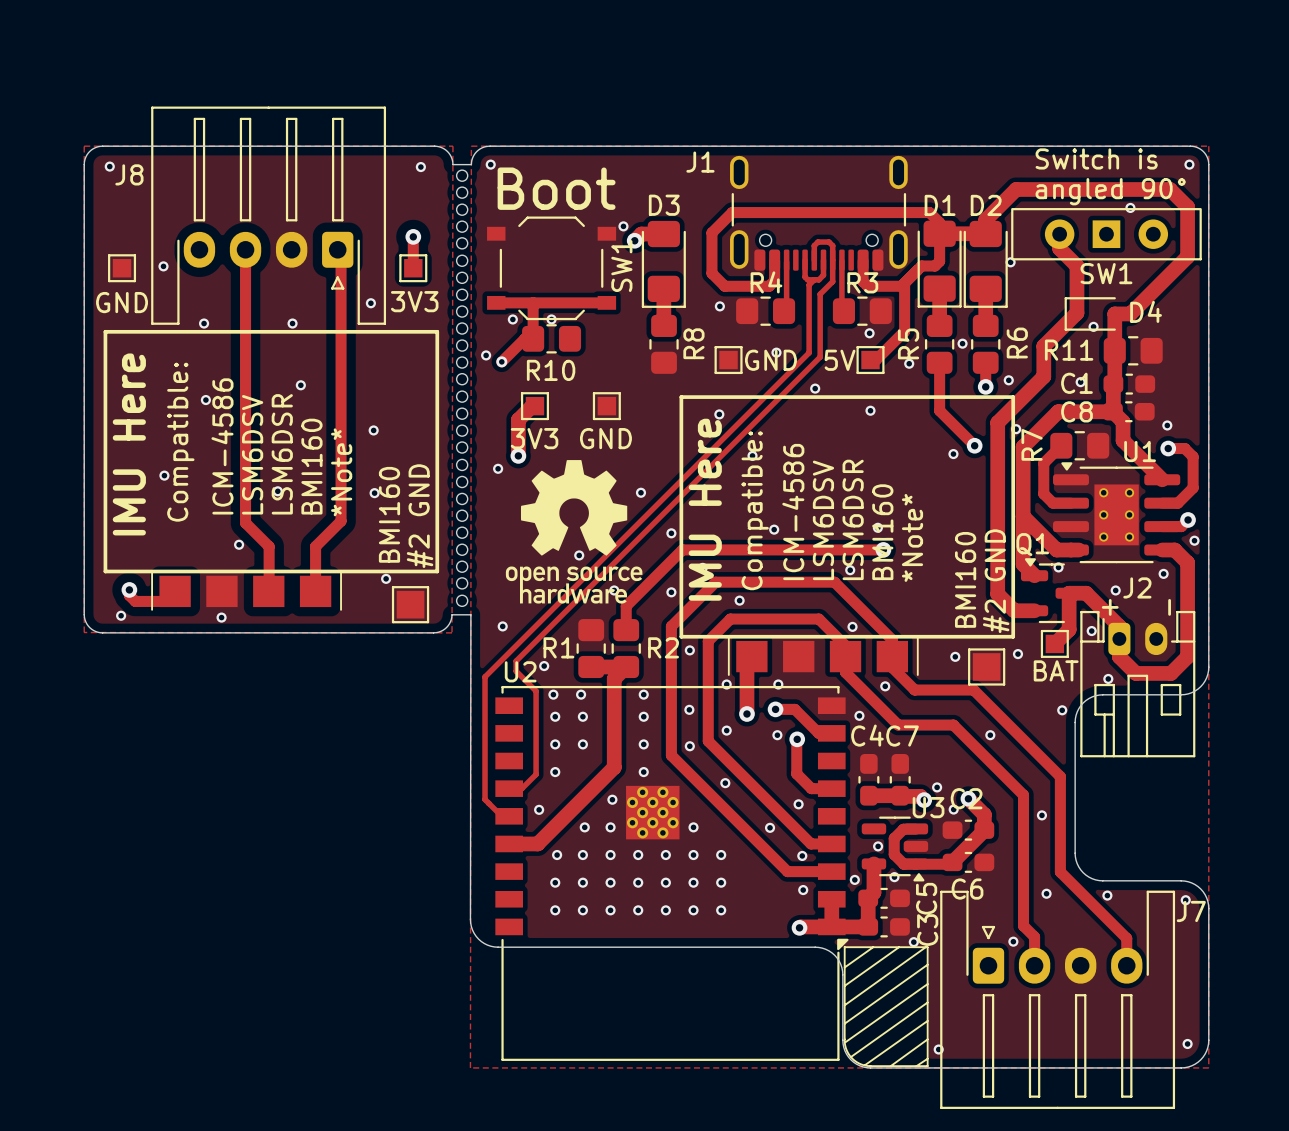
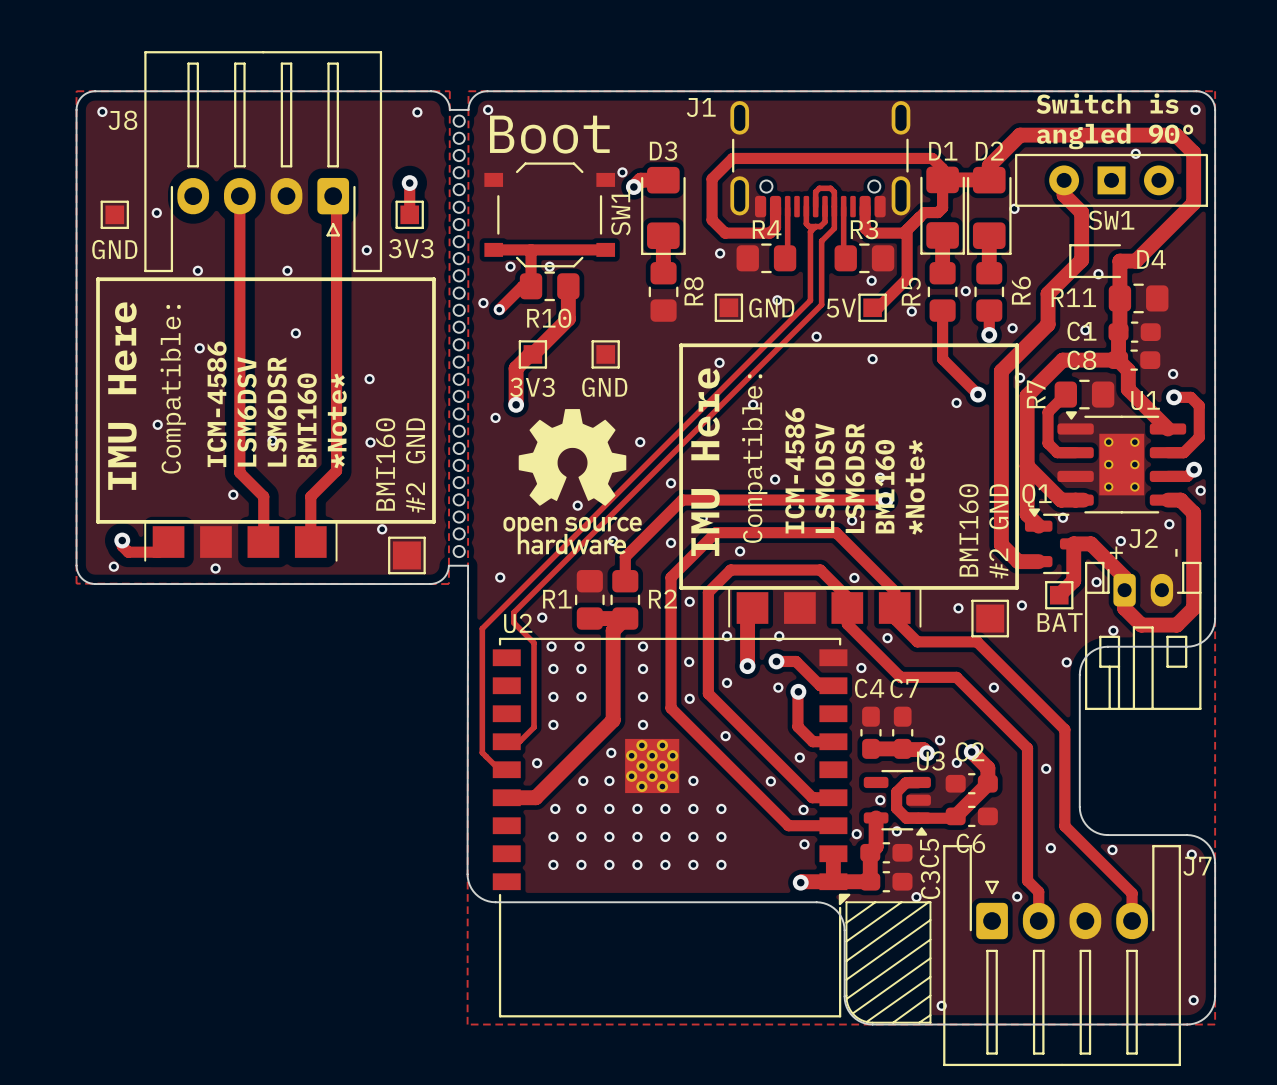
track: none -> (568, 286) (568, 318) (532, 354)

